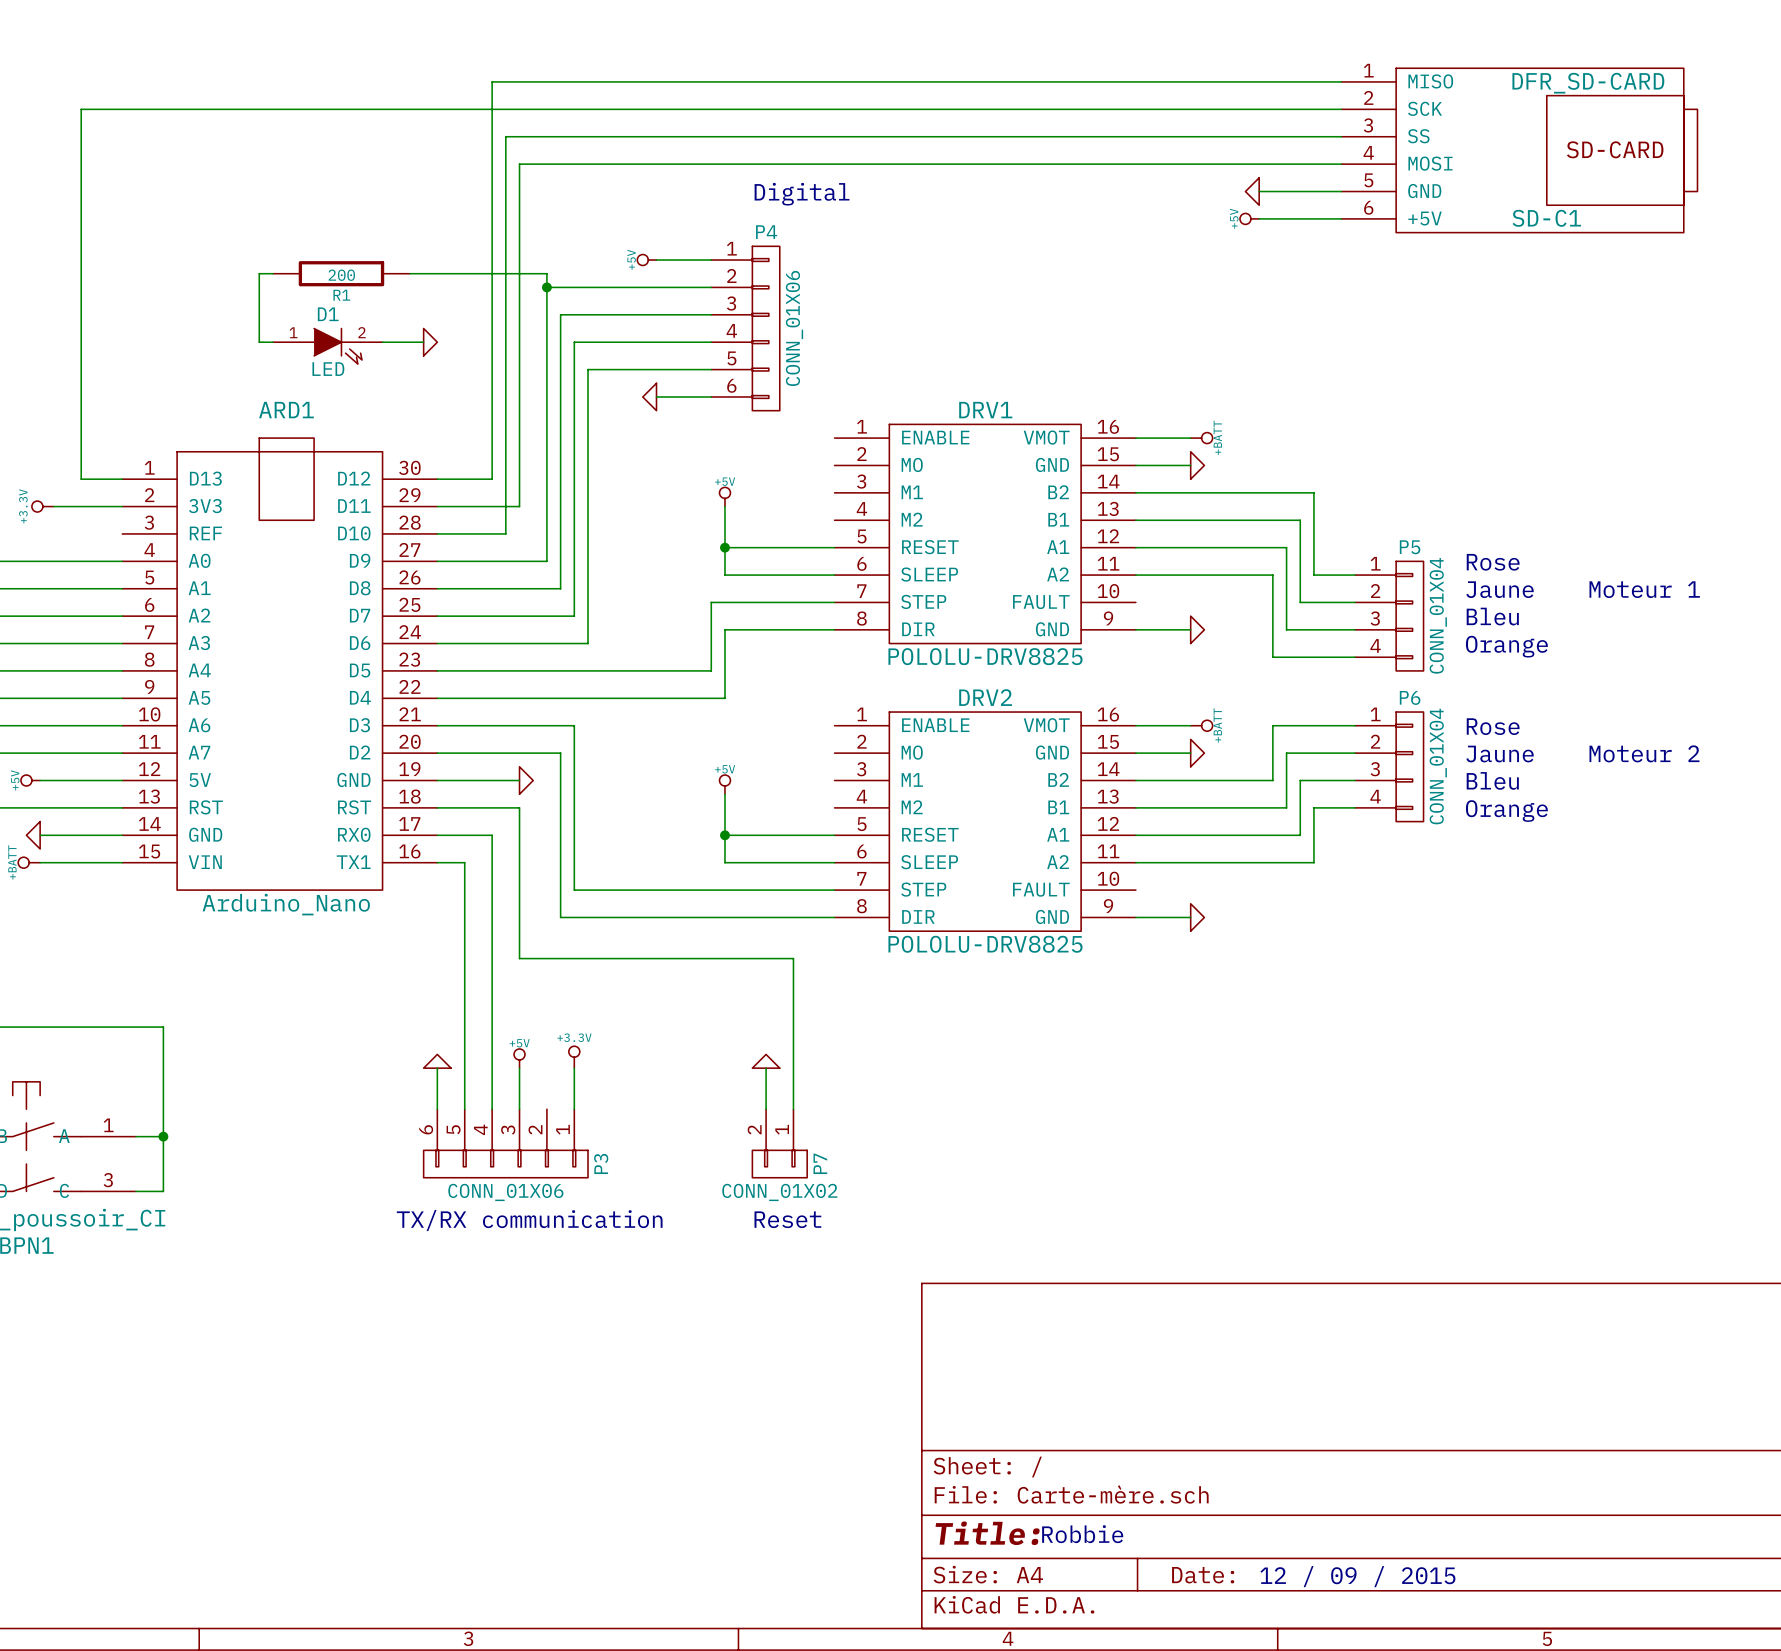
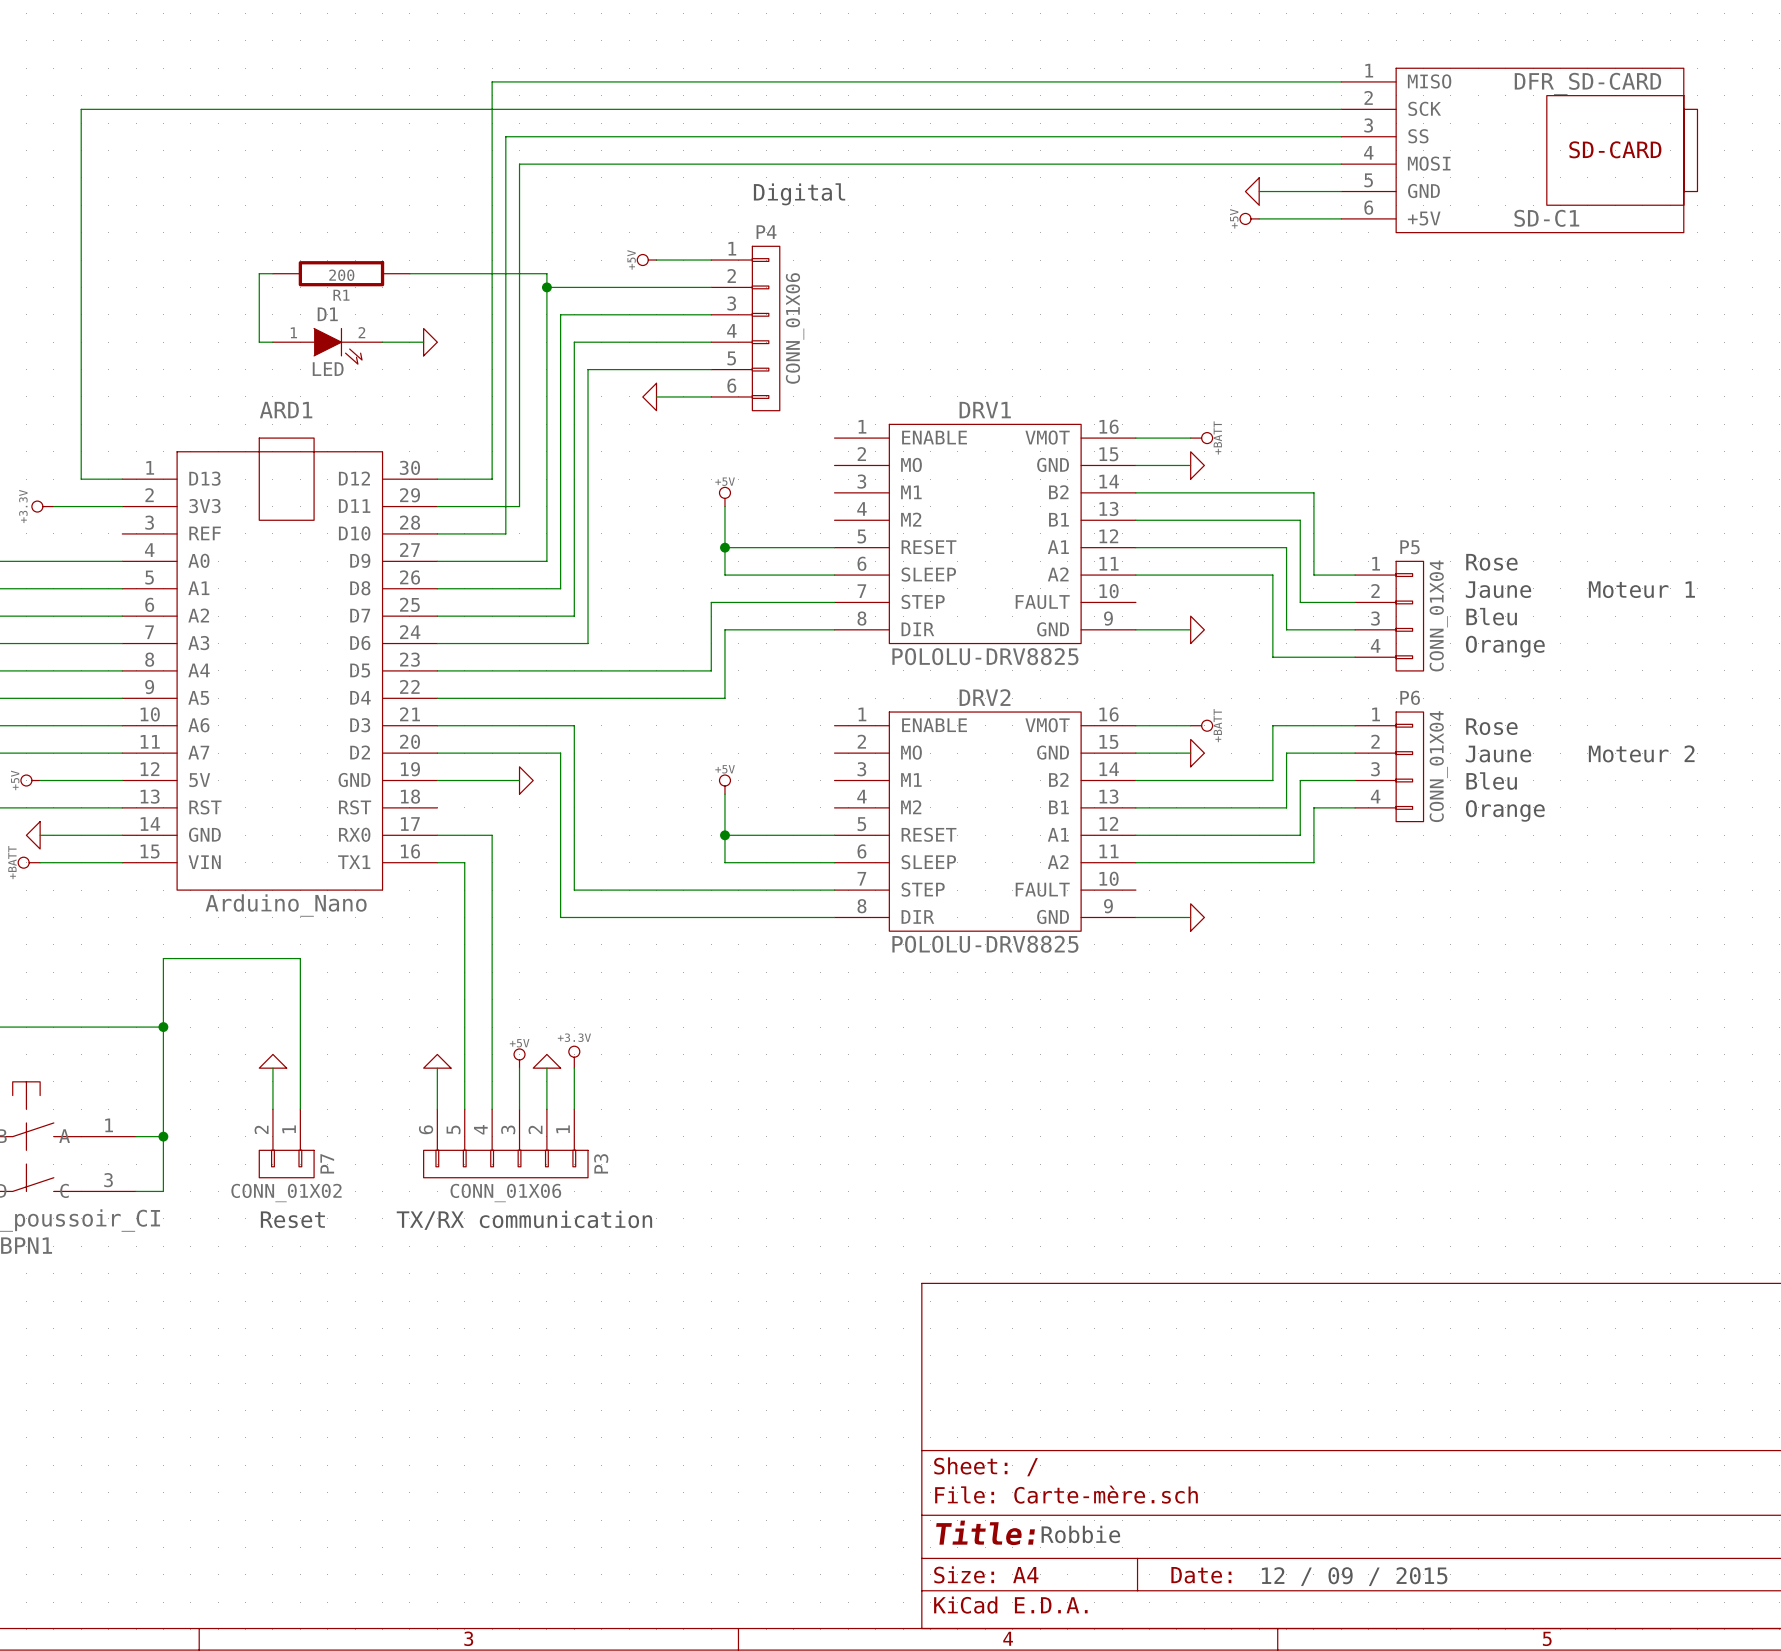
wire: (437, 807) (519, 807) (519, 958) (793, 958) (793, 1109) -> none
wire: none -> (163, 1027) (163, 958) (300, 958) (300, 1109)
junction: none -> (163, 1027)
power symbol: none -> (272, 1061)
power symbol position: (766, 1061) -> (546, 1061)
wire: none -> (272, 1068) (272, 1109)
wire: (766, 1068) (766, 1109) -> (546, 1068) (546, 1109)
P7 position: (779, 1143) -> (286, 1143)
text: none -> Reset (292, 1219)
text: Reset (787, 1219) -> none

